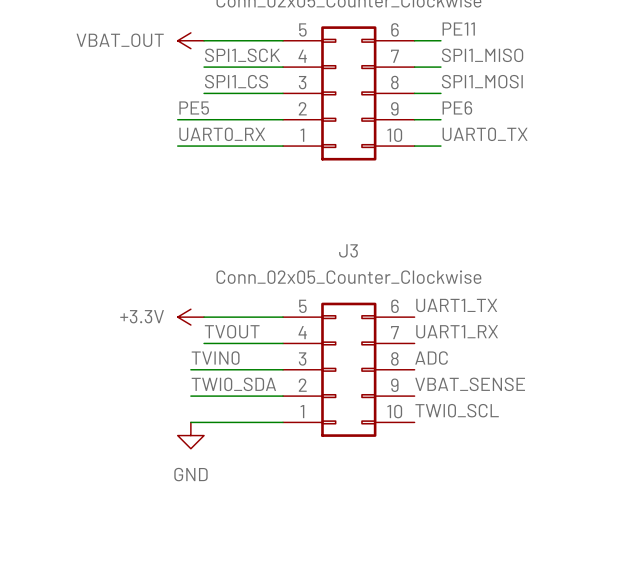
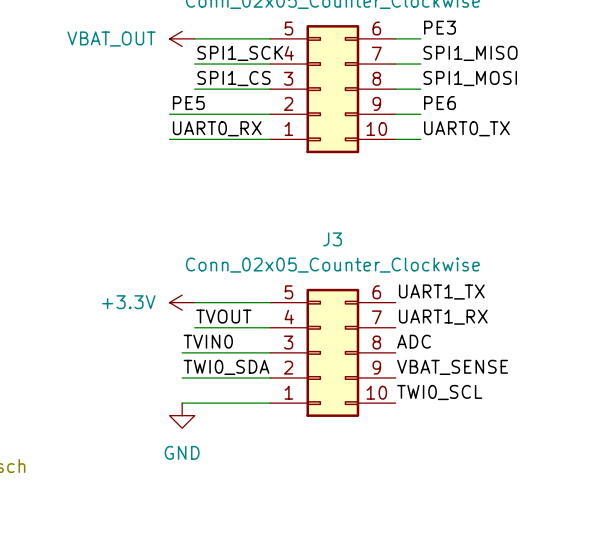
label: PE11 (458, 29) -> PE3 (440, 27)

